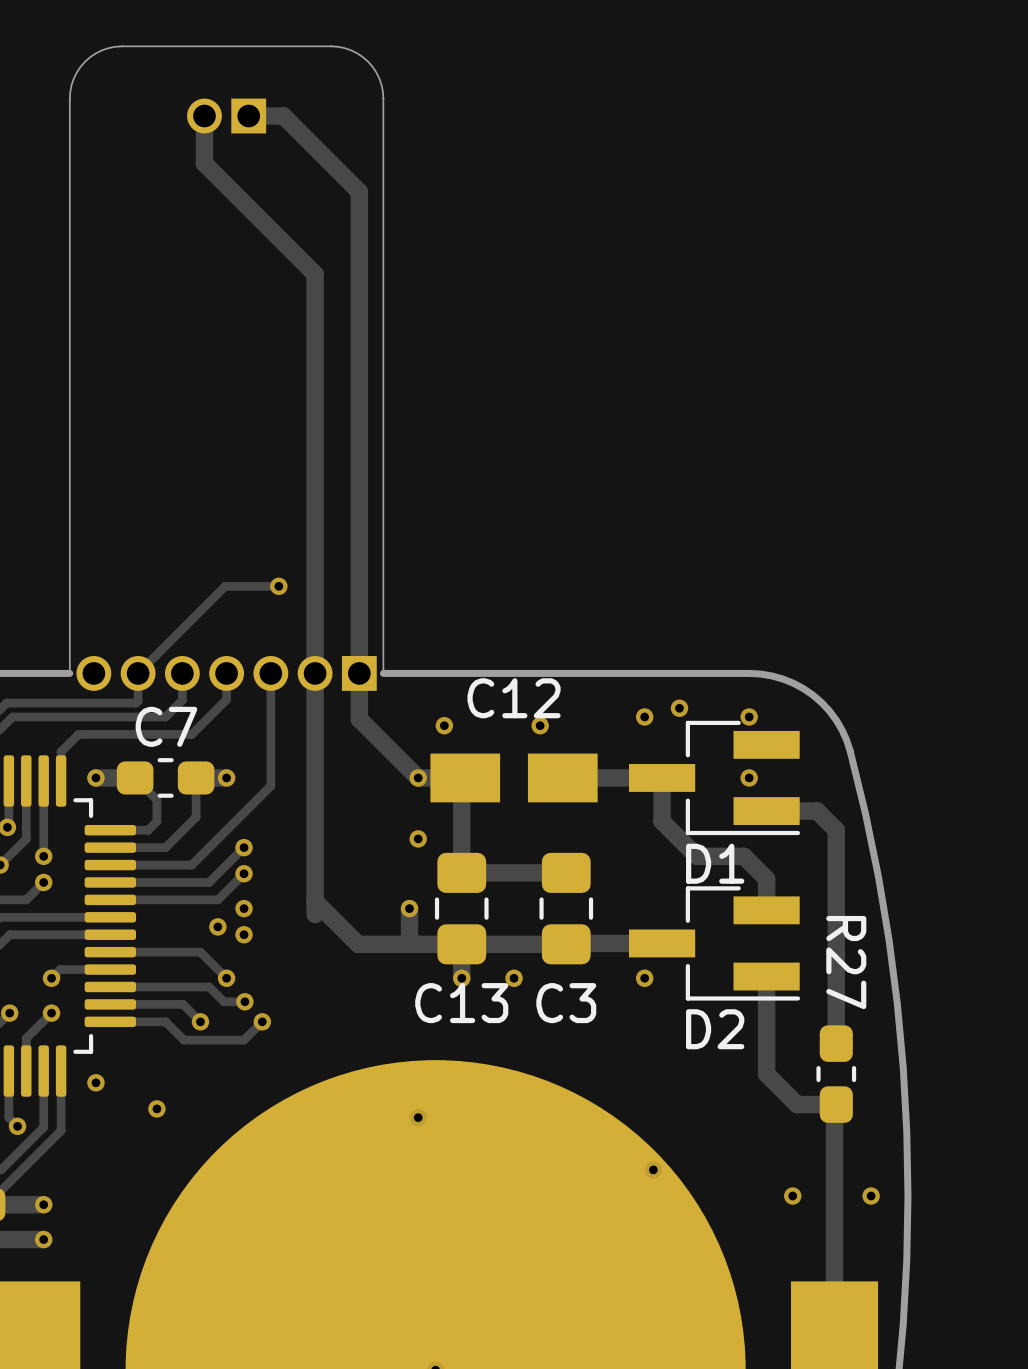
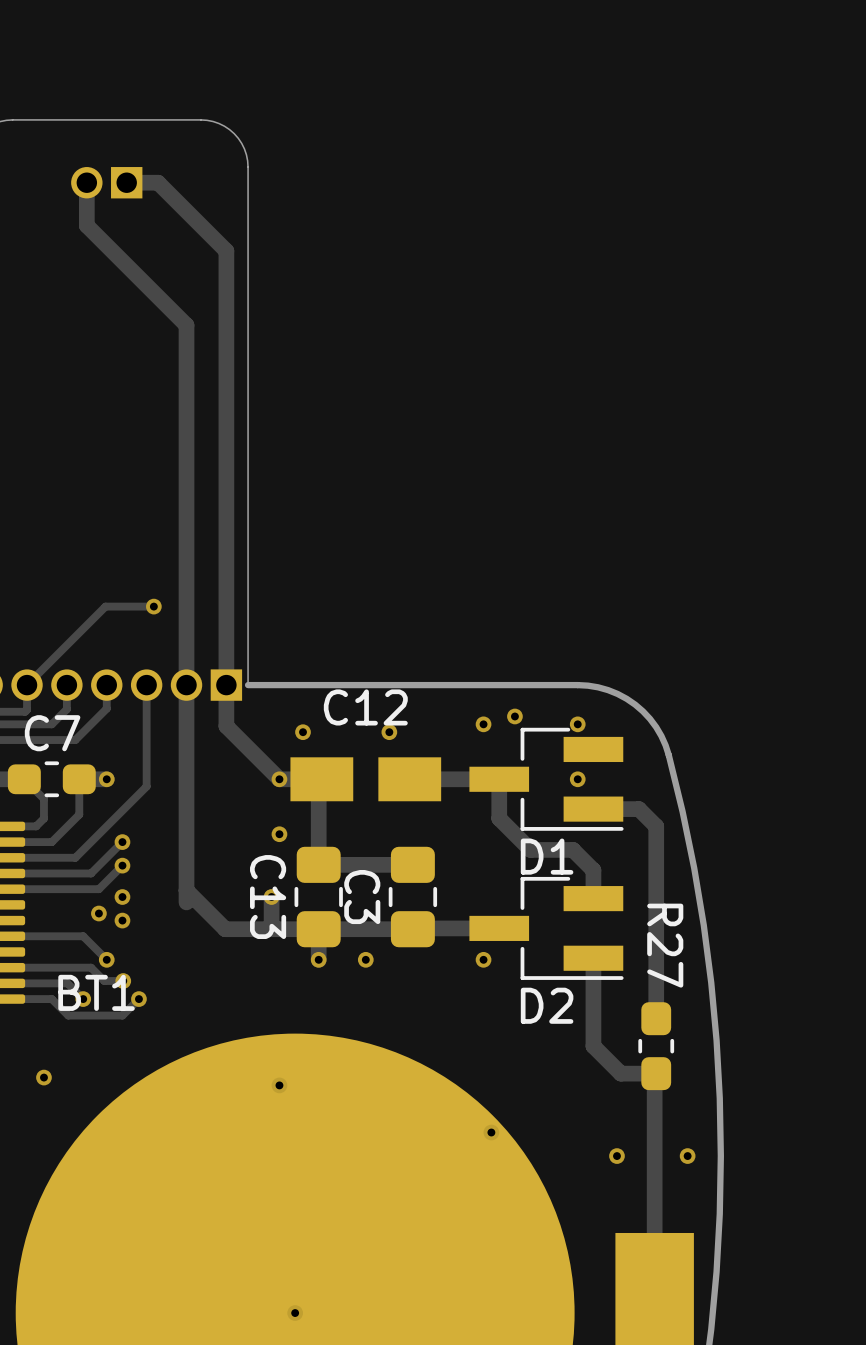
C13 name rotation: 0° (461, 1003) -> 90° clockwise (268, 897)
C3 name rotation: 0° (566, 1003) -> 90° clockwise (362, 897)
C3 name position: C3 (566, 1003) -> C3 (362, 897)
BT1 name: none -> BT1 (96, 992)

